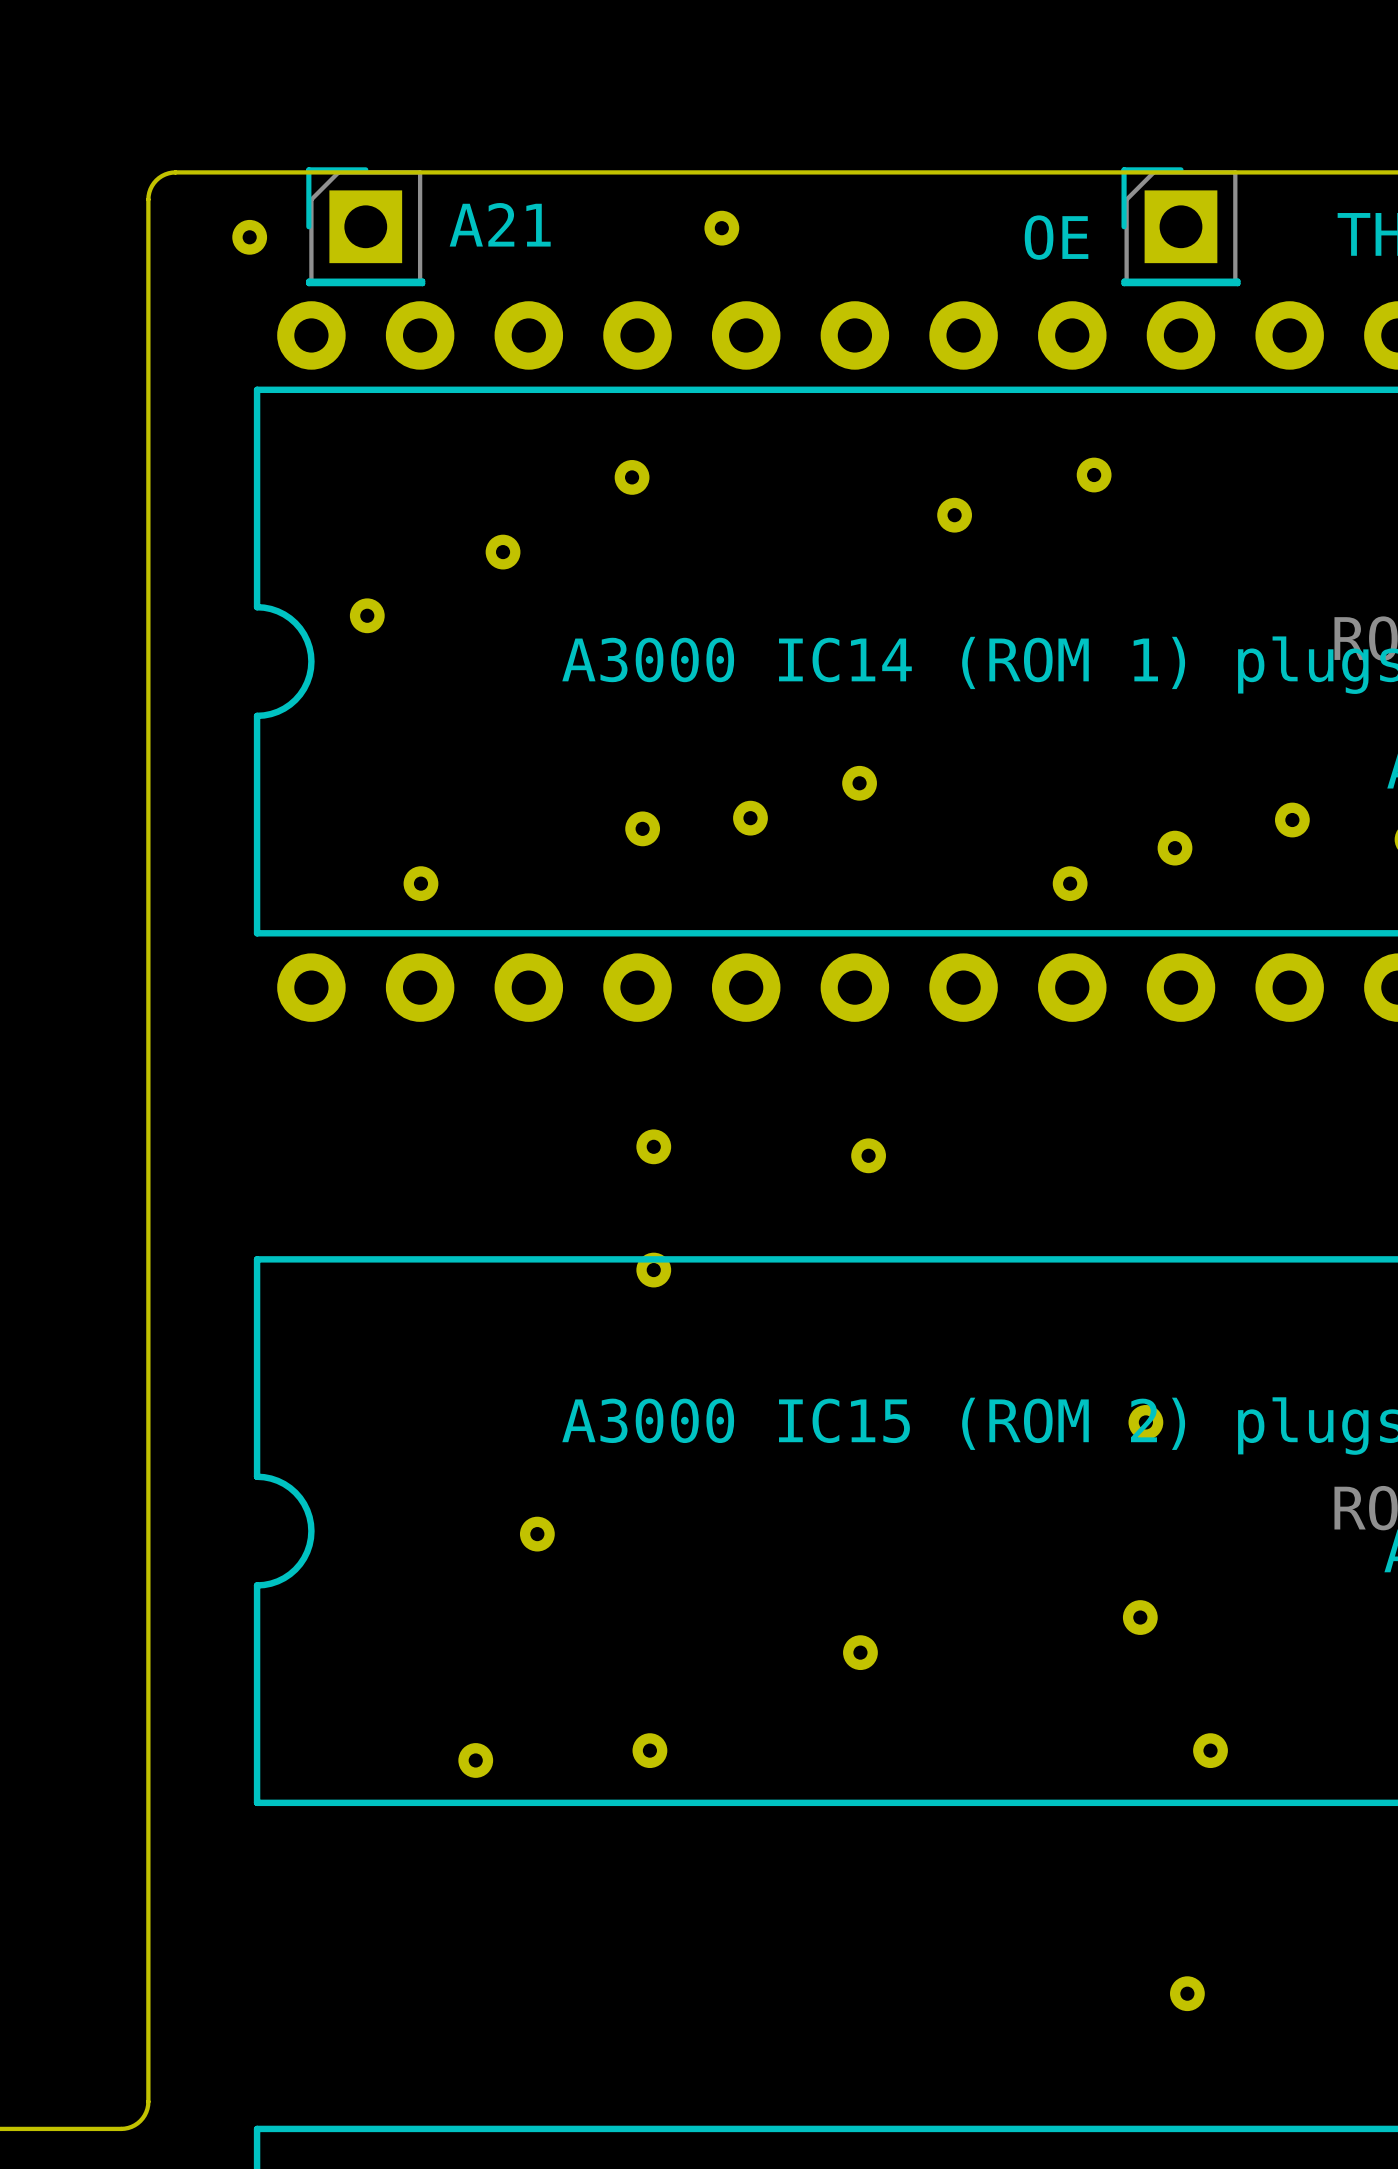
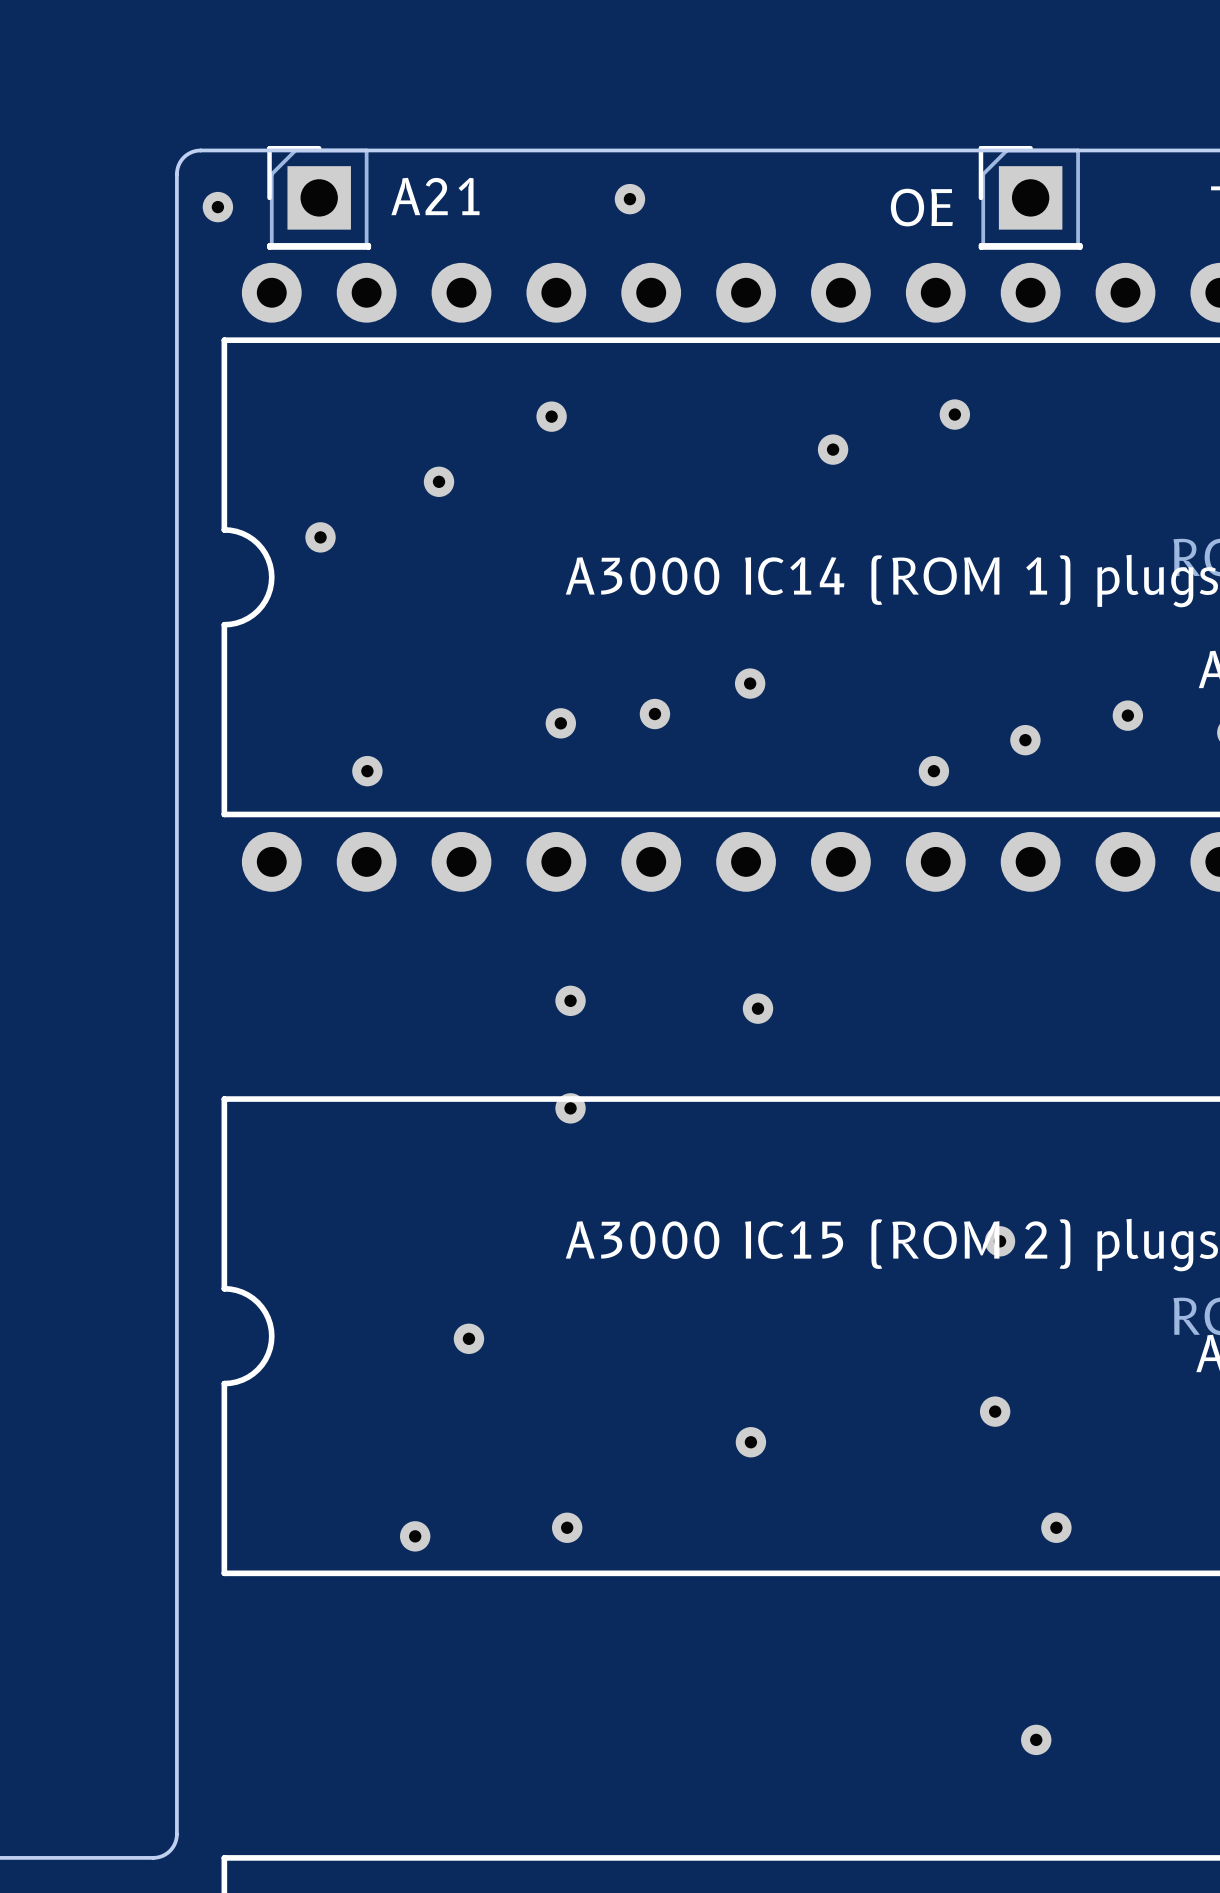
board edge: (229, 172) (168, 173) (153, 183) (148, 199) (148, 2101) (146, 2112) (140, 2120) (131, 2126) (121, 2128) -> (200, 150) (191, 152) (183, 157) (178, 165) (176, 174) (176, 1834) (172, 1848) (159, 1857) (105, 1857)

